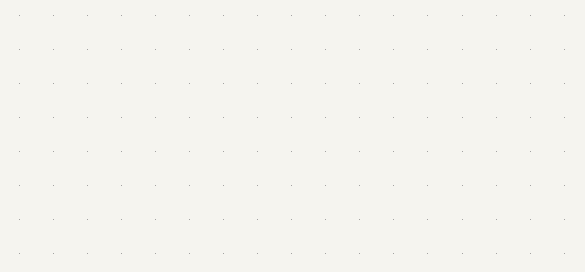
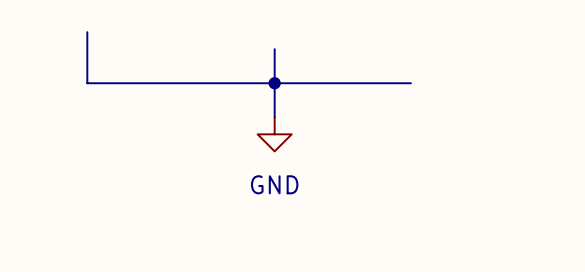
wire: none -> (87, 32) (87, 83) (410, 83)
wire: none -> (274, 49) (274, 117)
junction: none -> (274, 83)
power symbol: none -> GND (274, 134)

